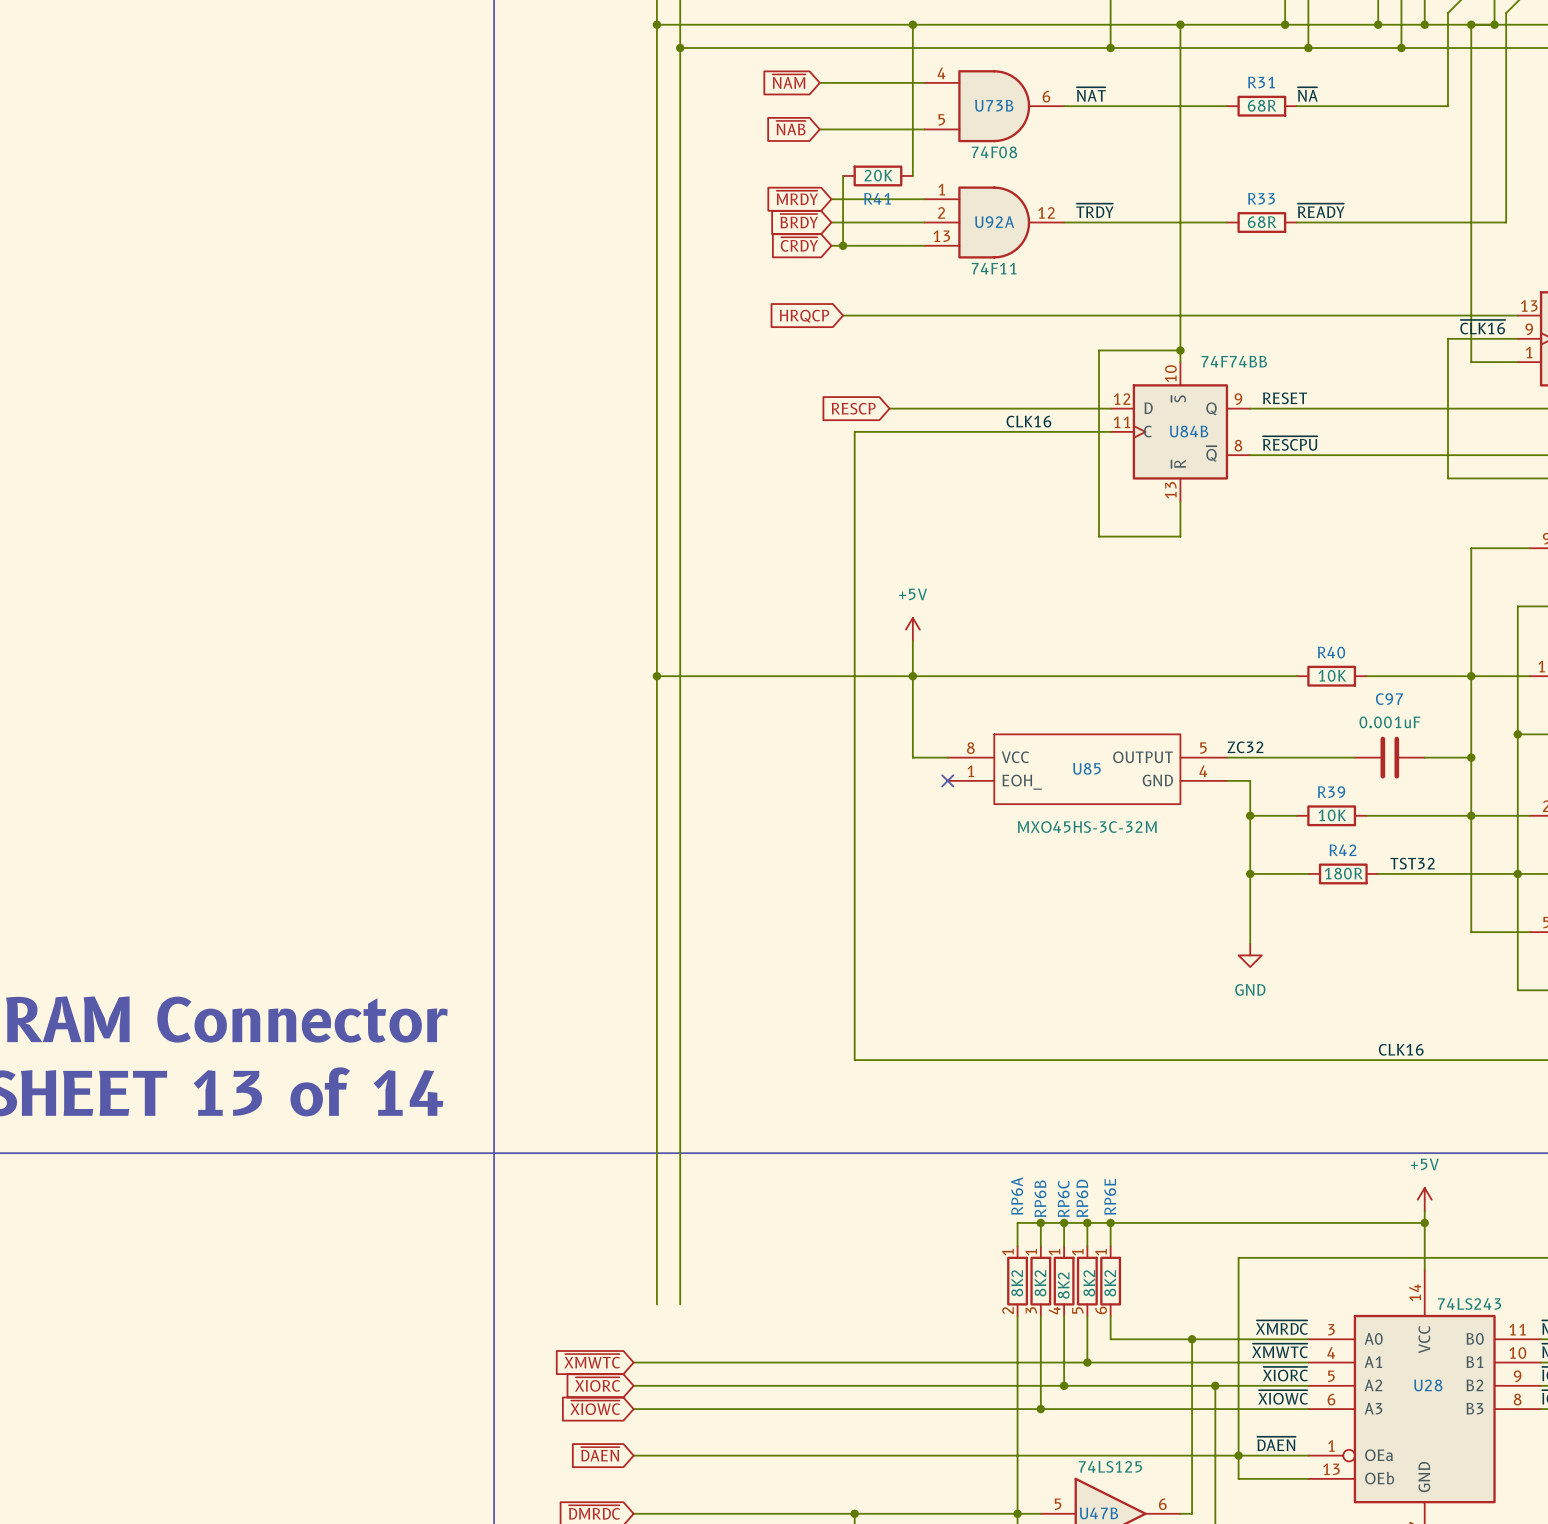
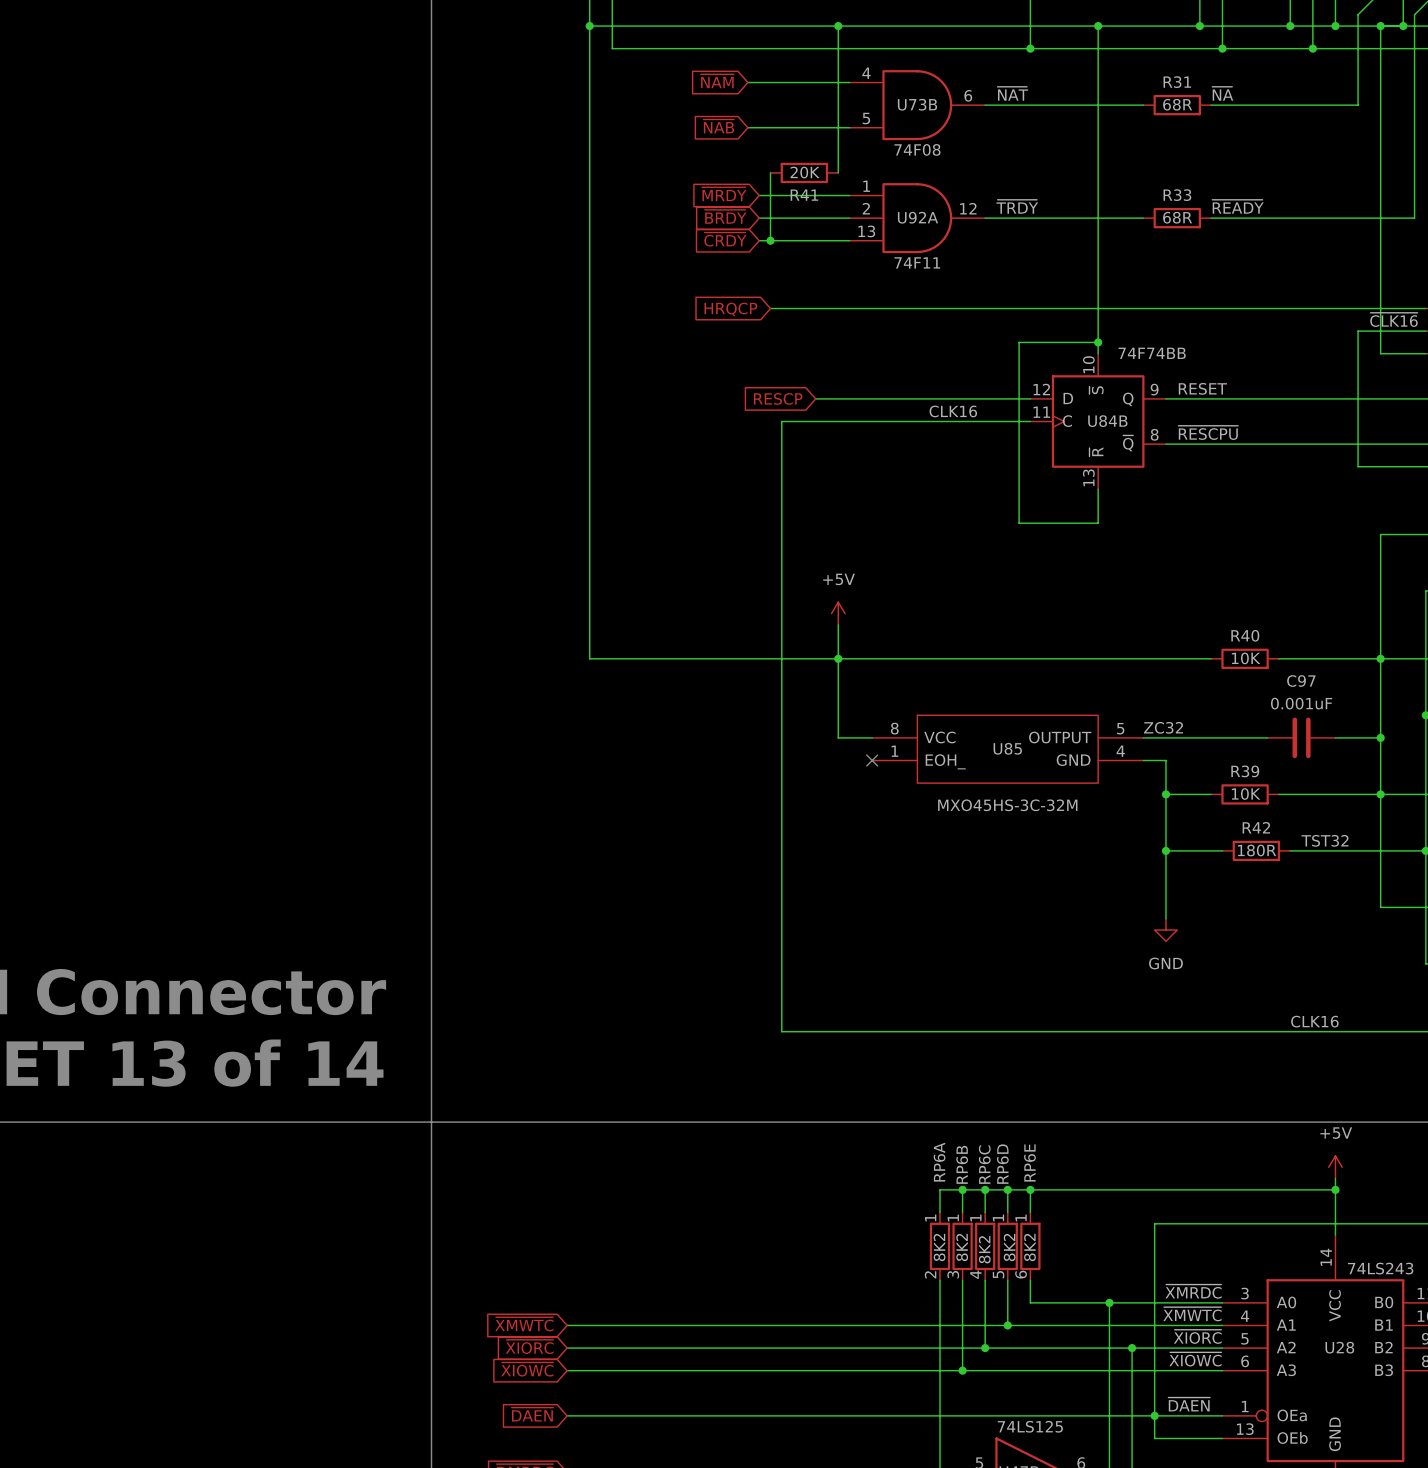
wire: (680, 48) (680, 1304) -> none
junction: (680, 48) -> none
wire: (656, 676) (656, 1304) -> none
junction: (656, 676) -> none

